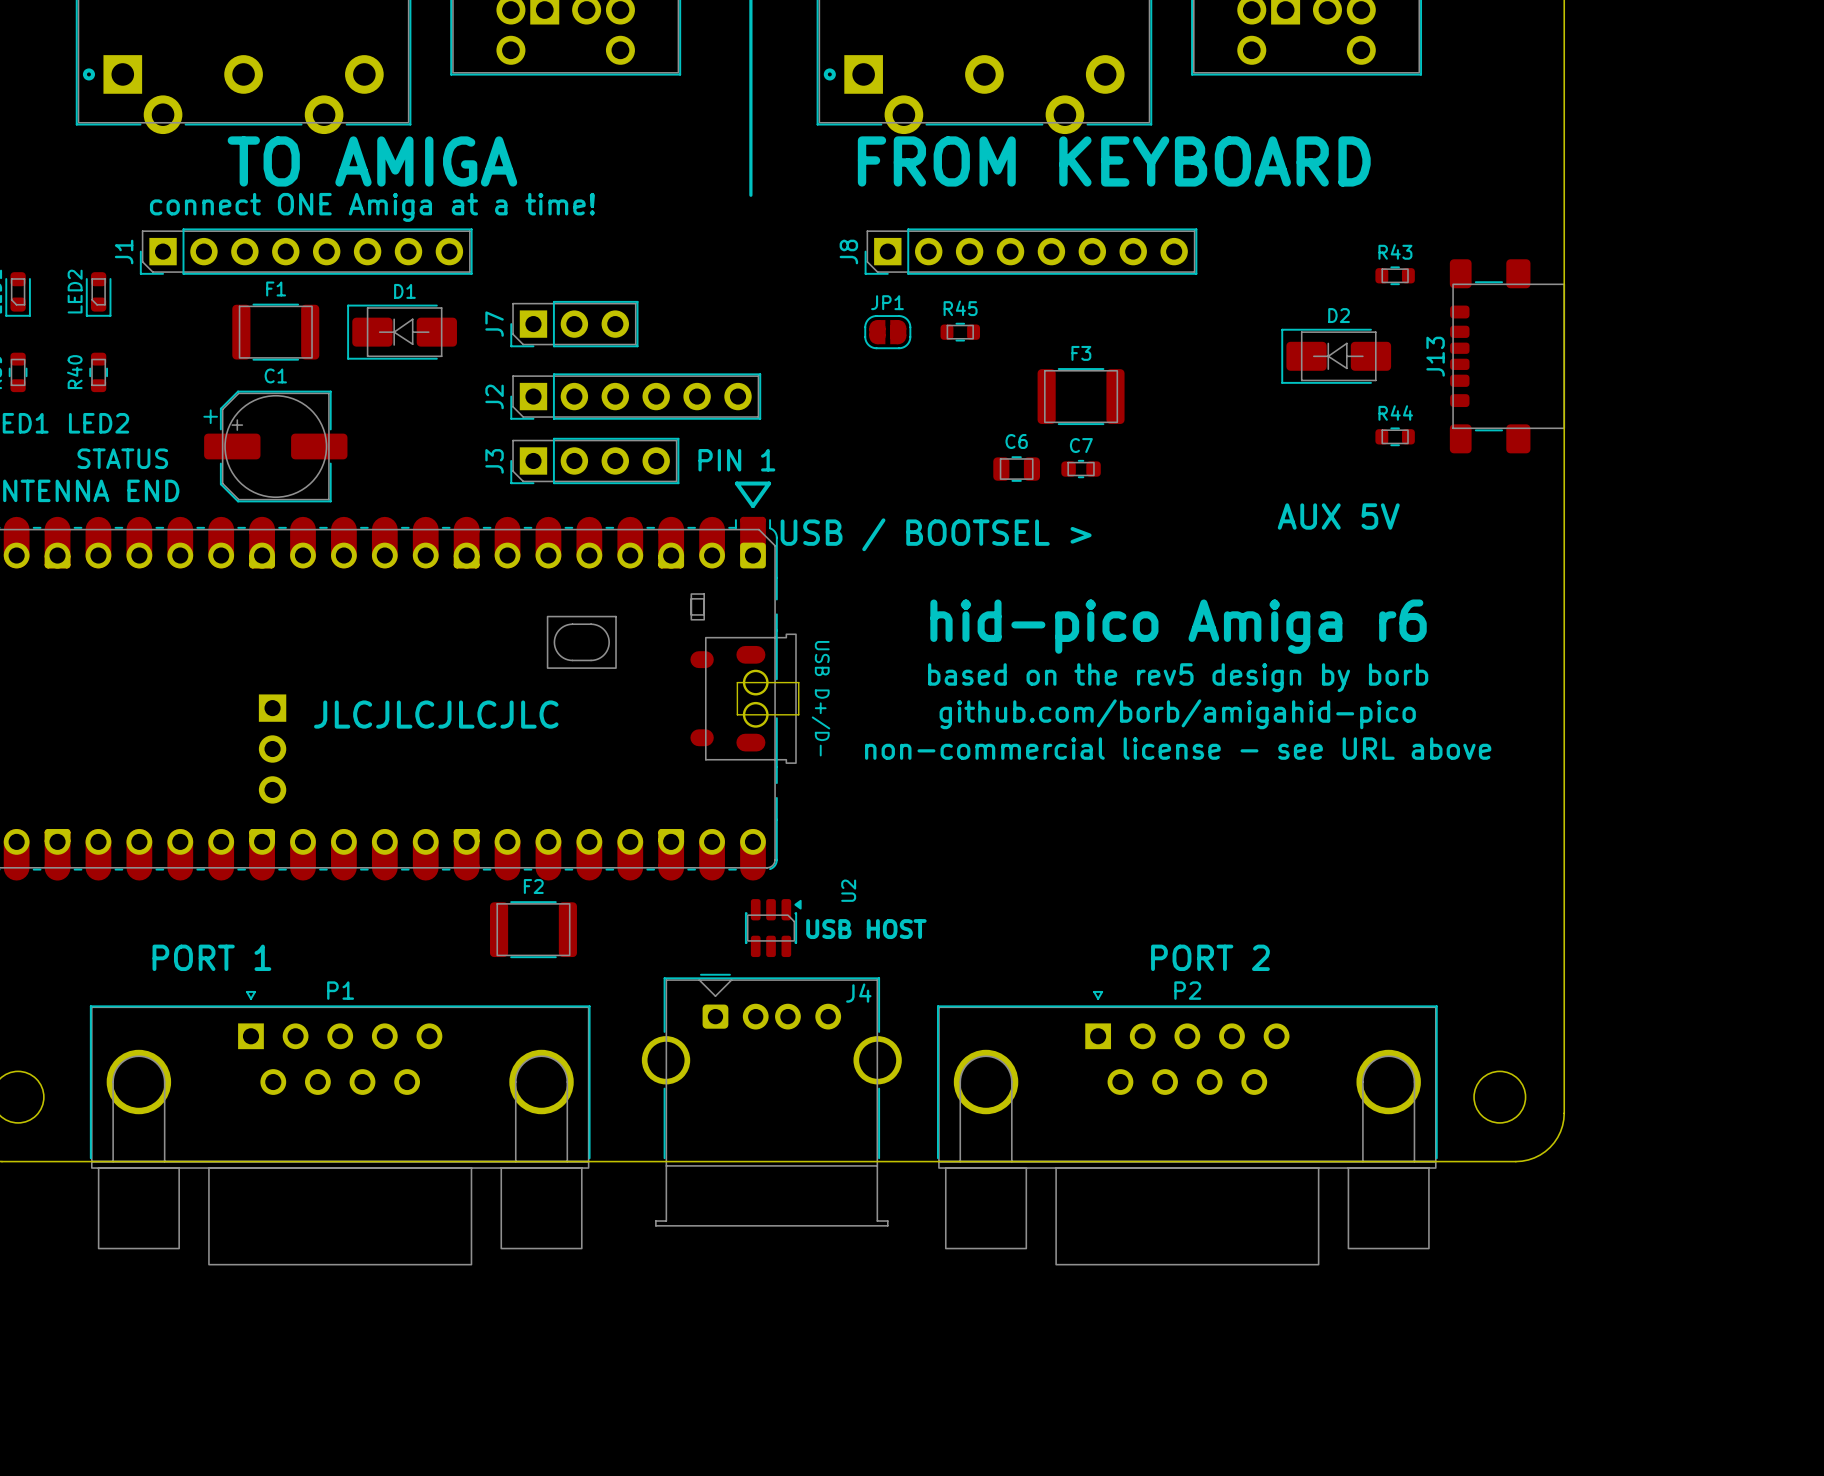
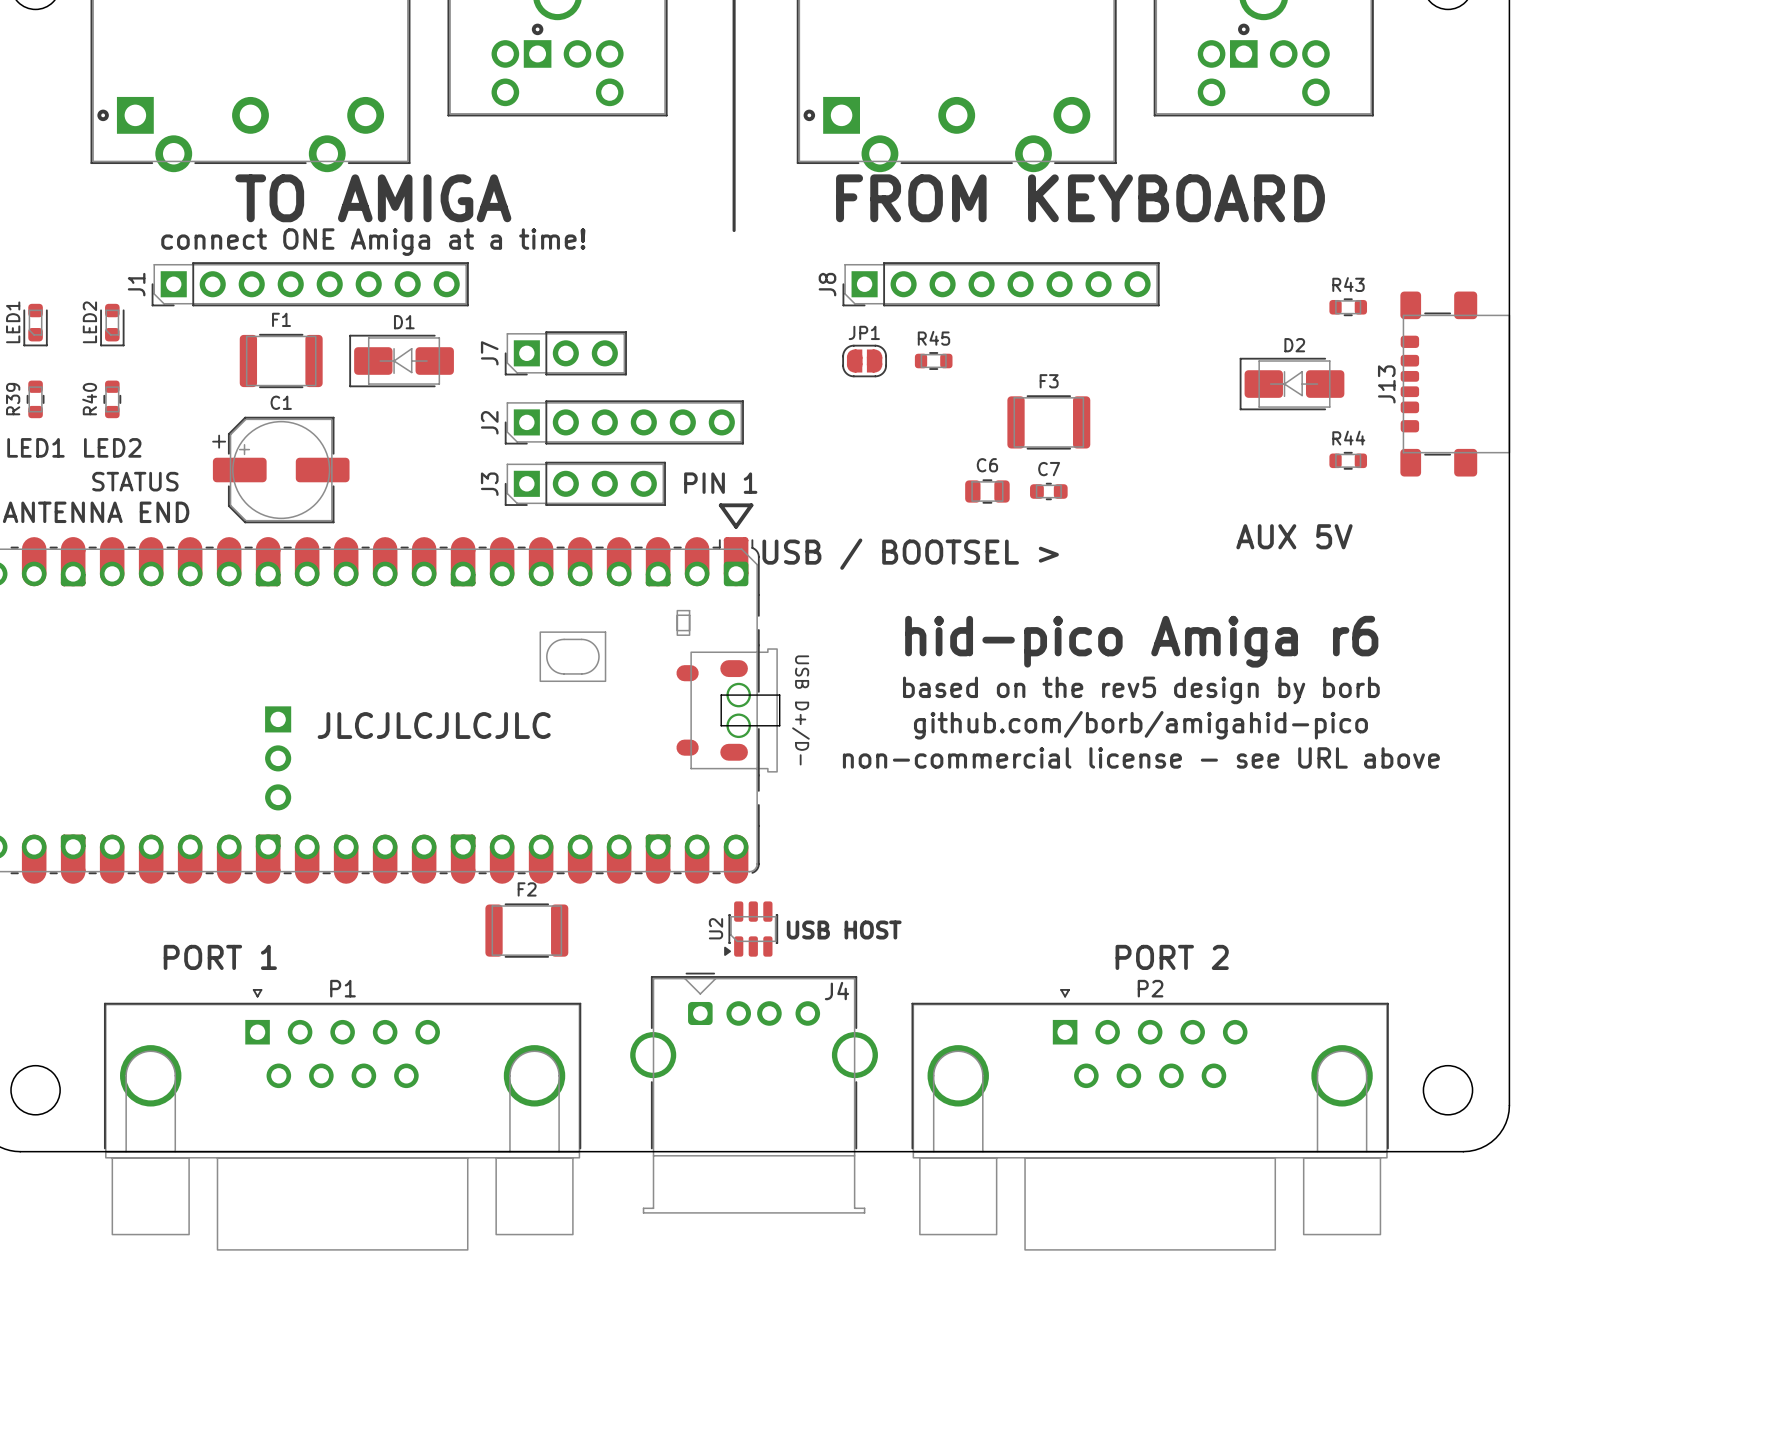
U2 name position: U2 (848, 890) -> U2 (715, 928)
U2 rotation: 0° (773, 928) -> 180° (751, 929)

